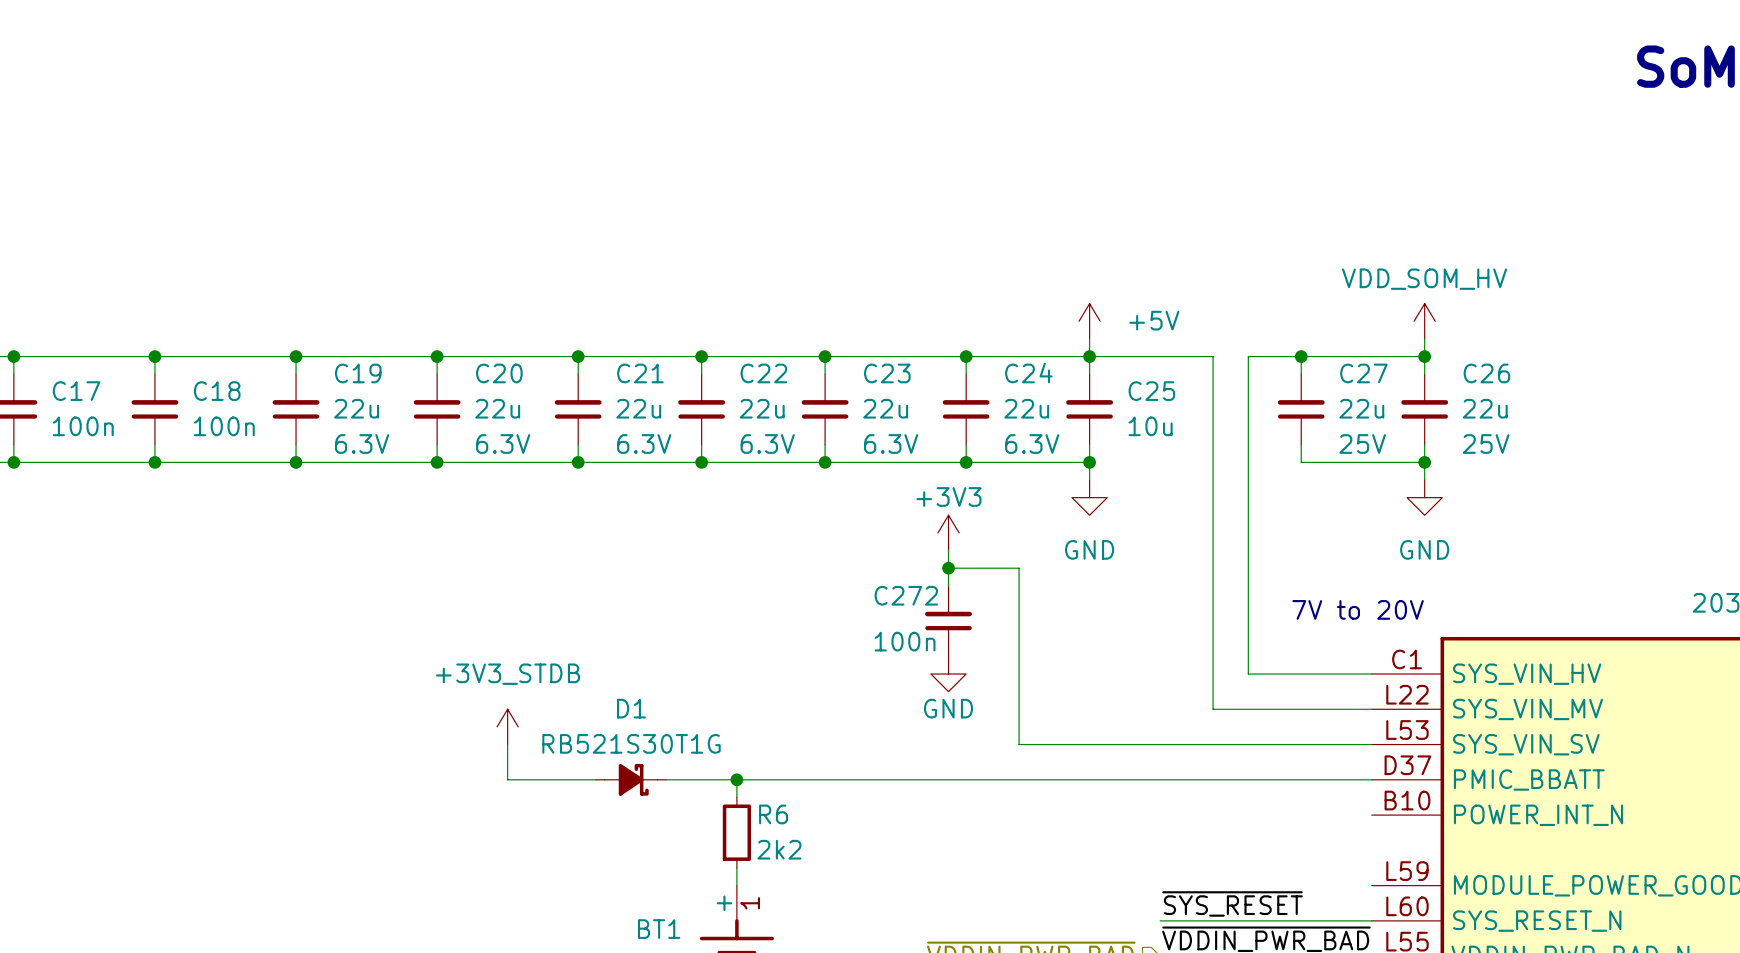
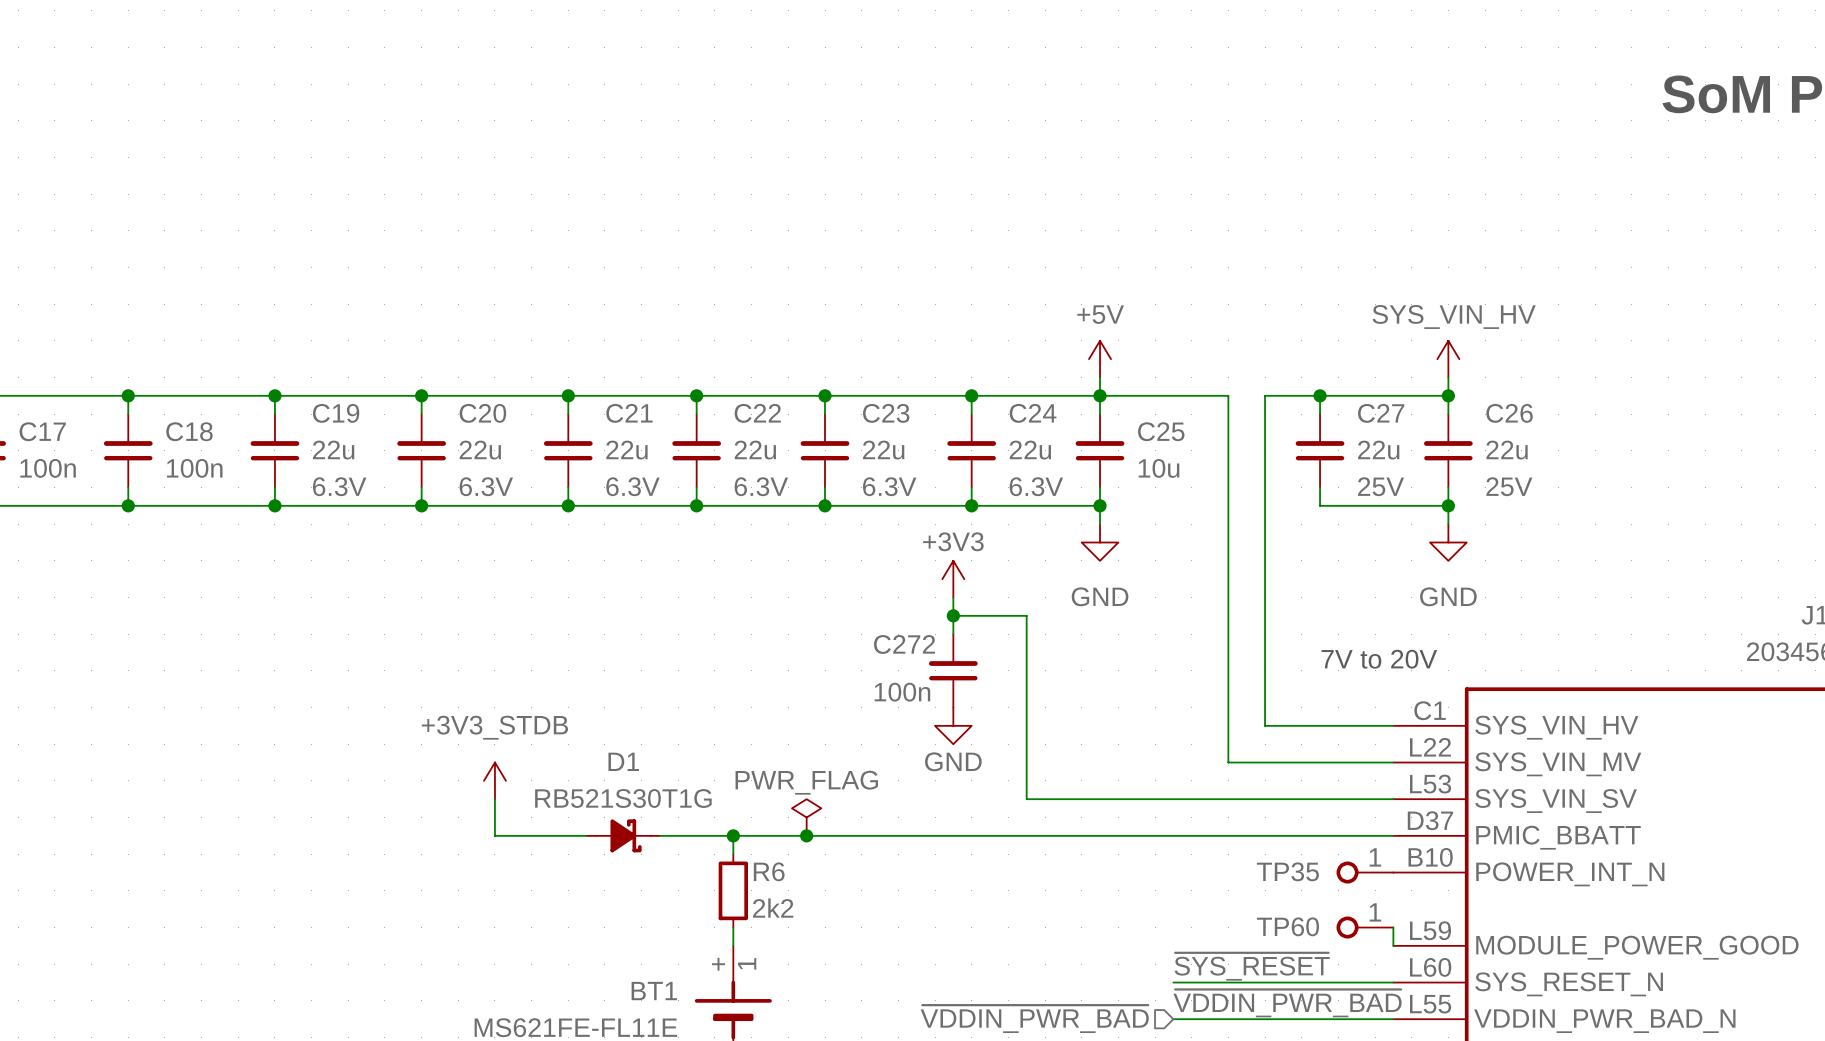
power symbol text position: +5V (1154, 320) -> +5V (1100, 314)
power symbol: VDD_SOM_HV (1424, 321) -> SYS_VIN_HV (1448, 359)
power symbol: none -> PWR_FLAG (806, 817)
junction: none -> (806, 835)
TP35: none -> (1364, 872)
TP60: none -> (1364, 927)
wire: none -> (1393, 927) (1393, 945)

